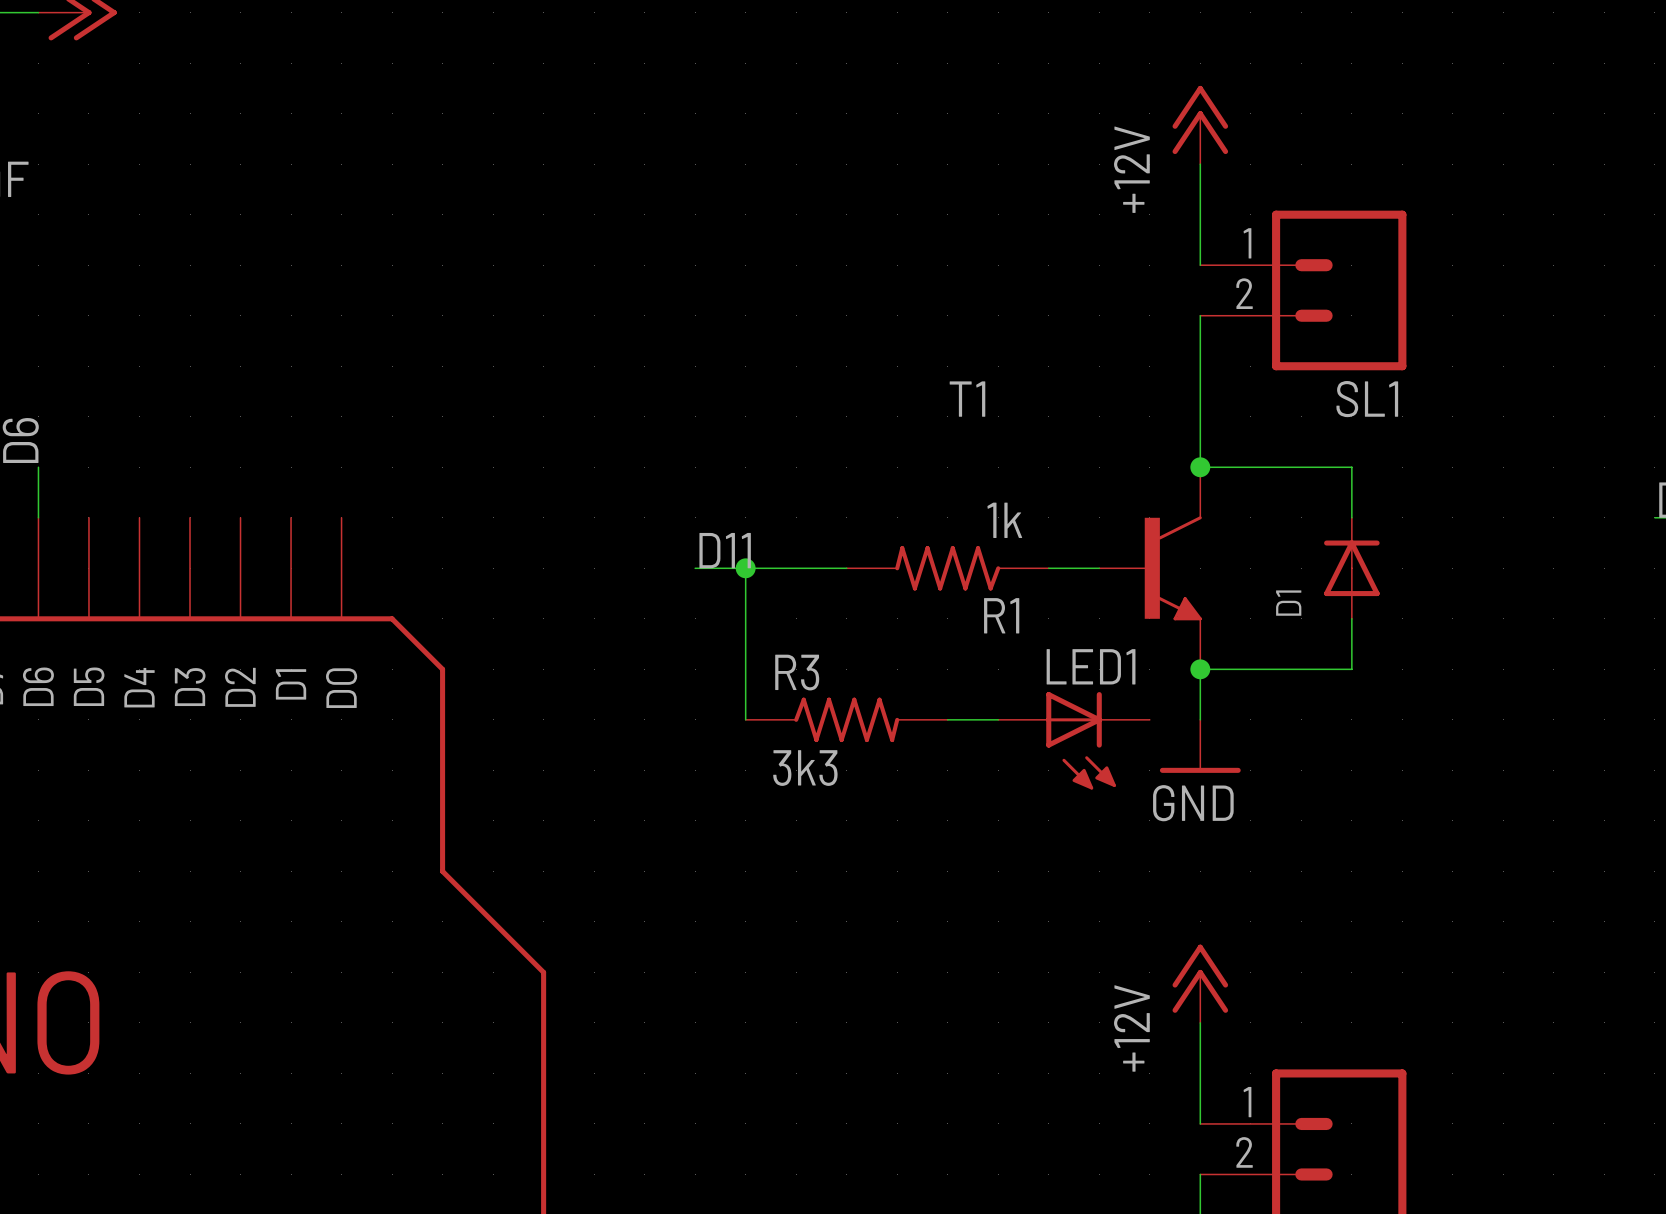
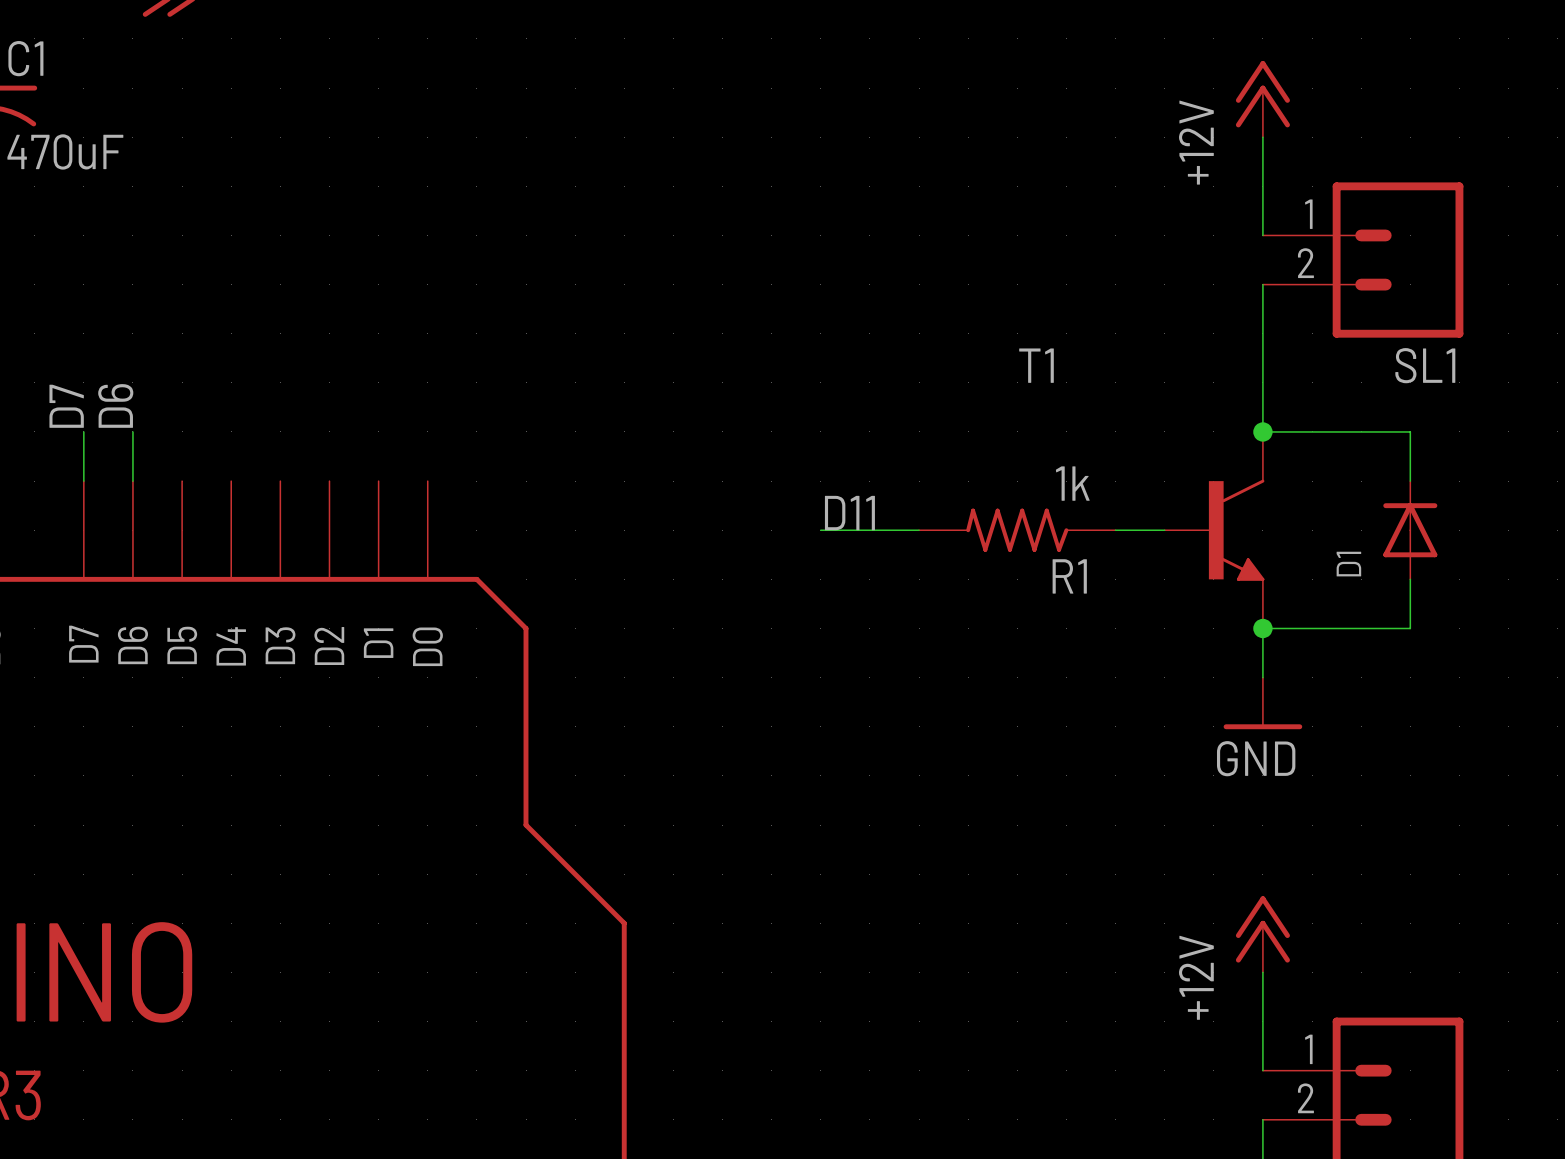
label position: D11 (725, 550) -> D11 (849, 513)
wire: (695, 568) (745, 568) (745, 719) -> none
junction: (745, 568) -> none
R3: 3k3 (846, 719) -> none
wire: (947, 719) (998, 719) -> none
LED1: (1074, 740) -> none

